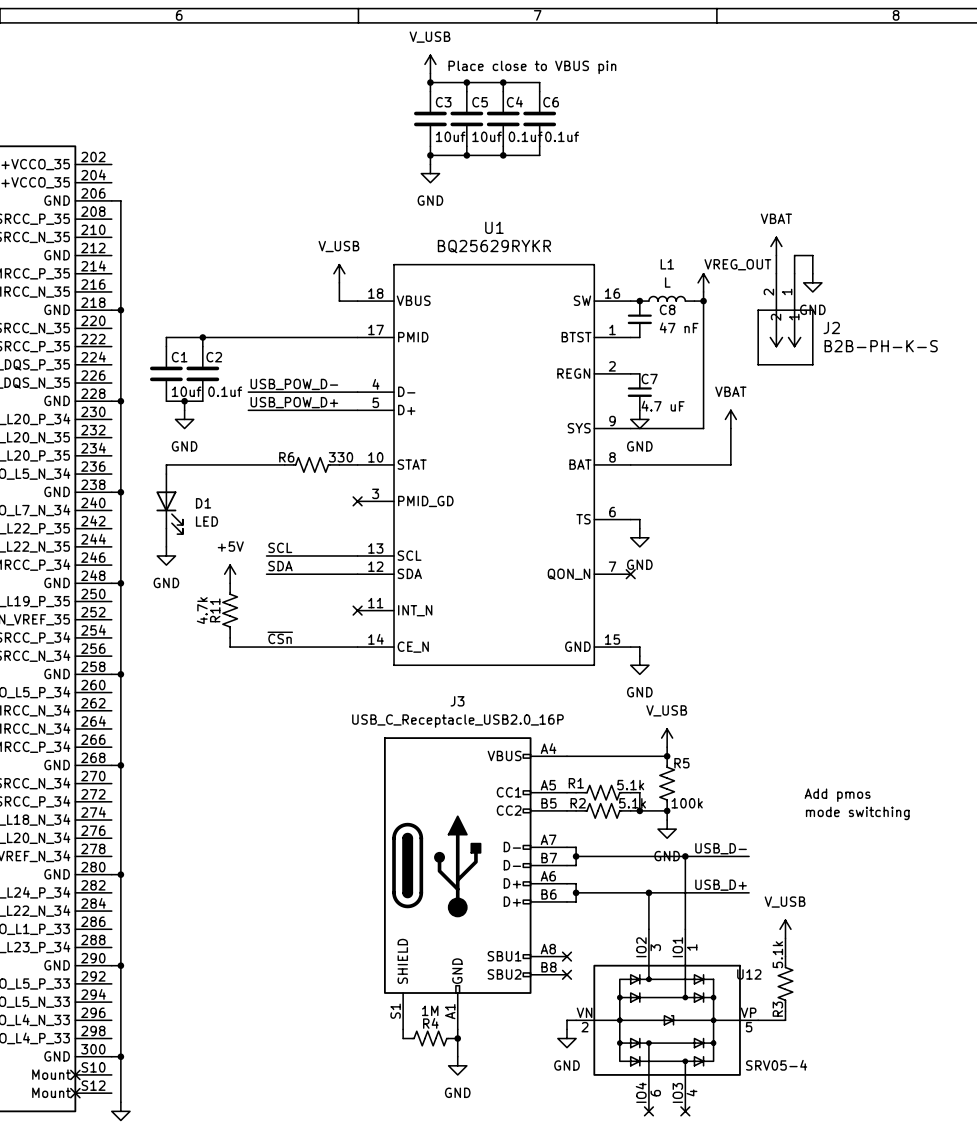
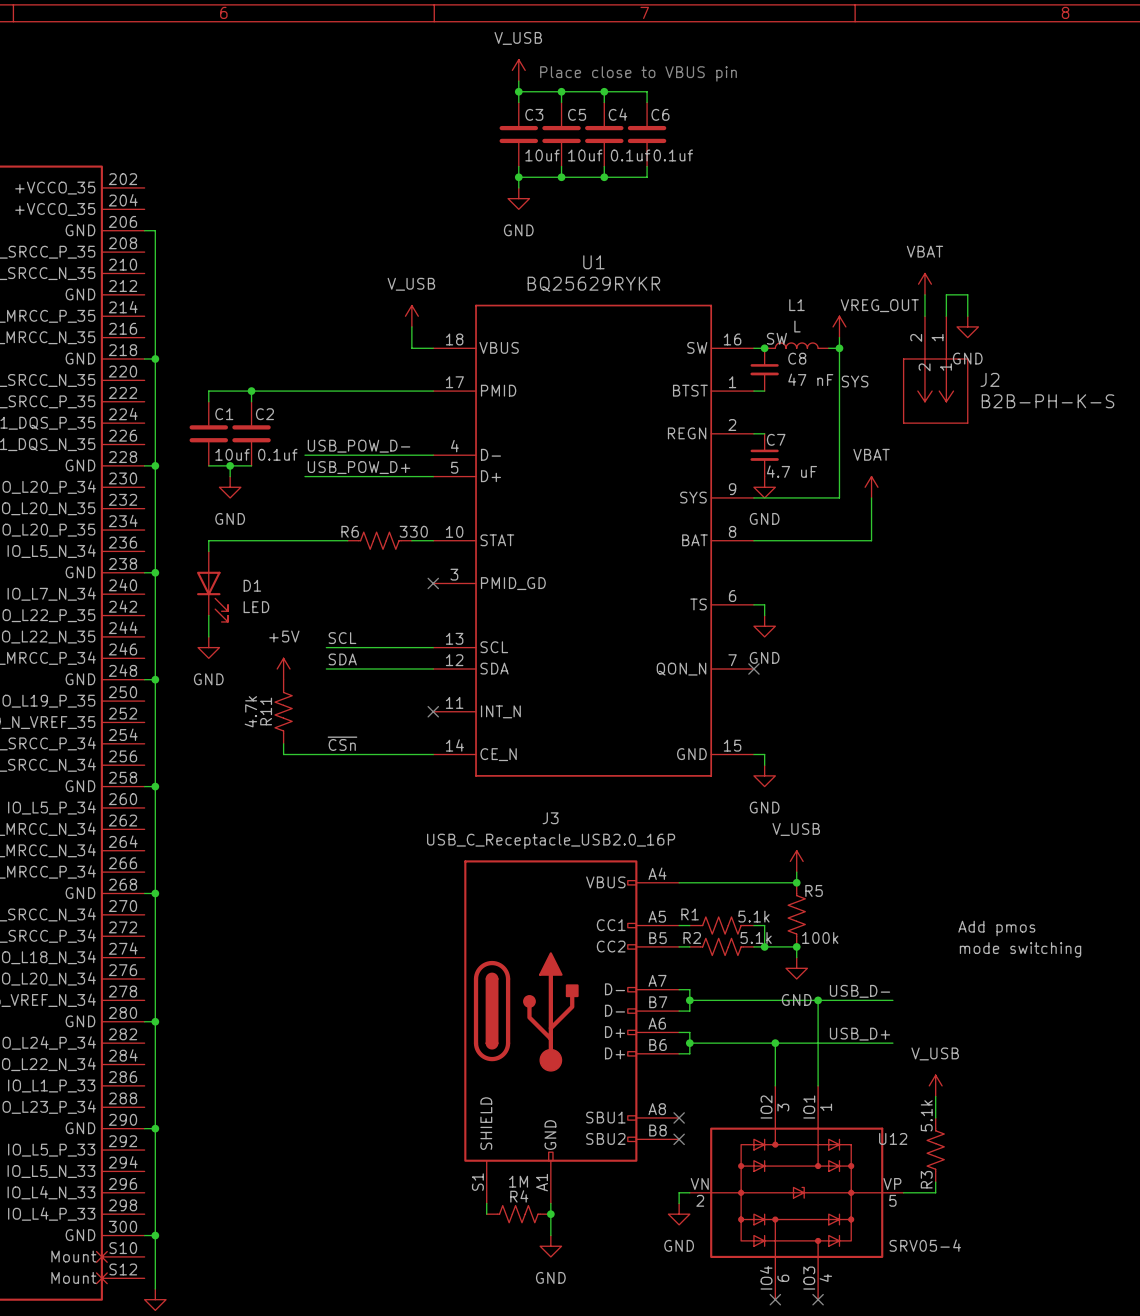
label: none -> SW (776, 338)
label: none -> SYS (855, 381)

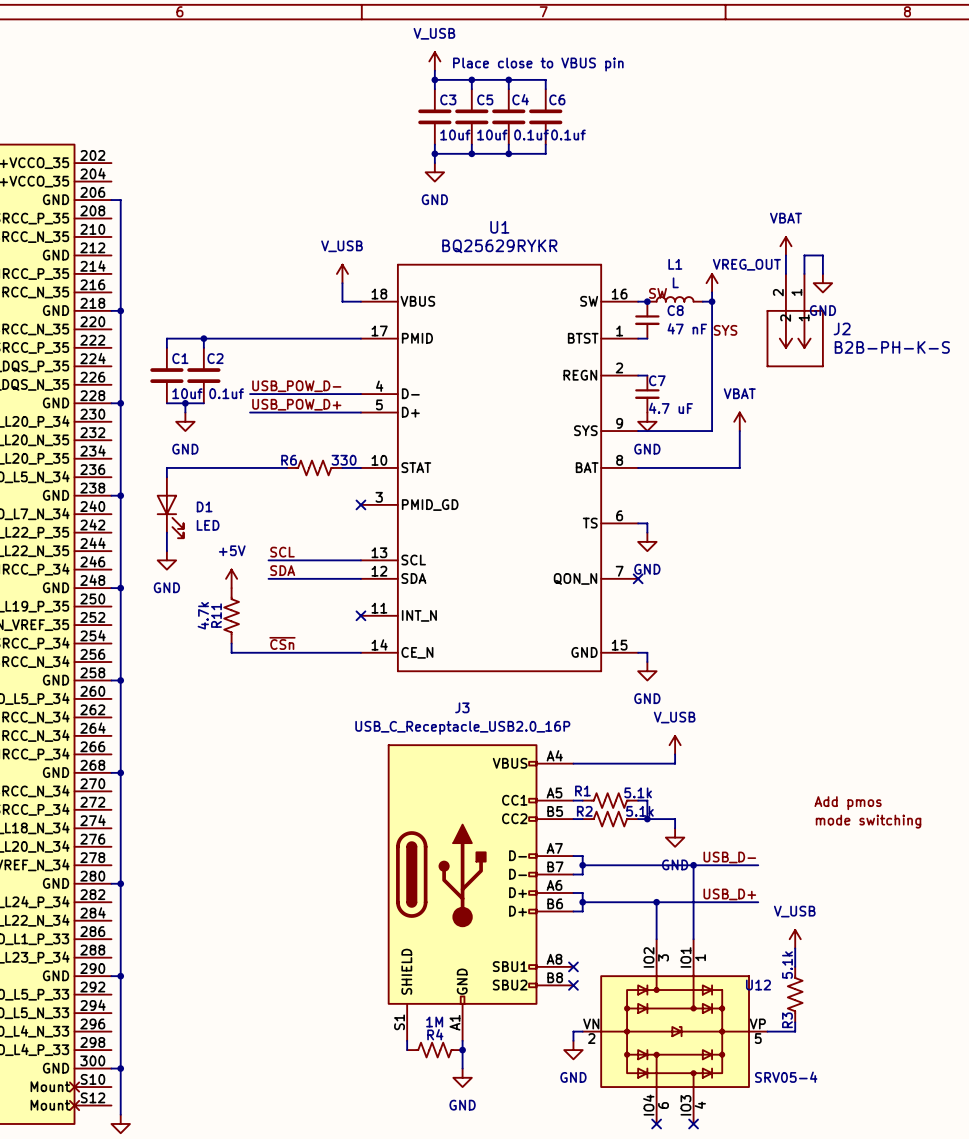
junction: (796, 882) -> none
R5: 100k (796, 914) -> none
junction: (796, 946) -> none

